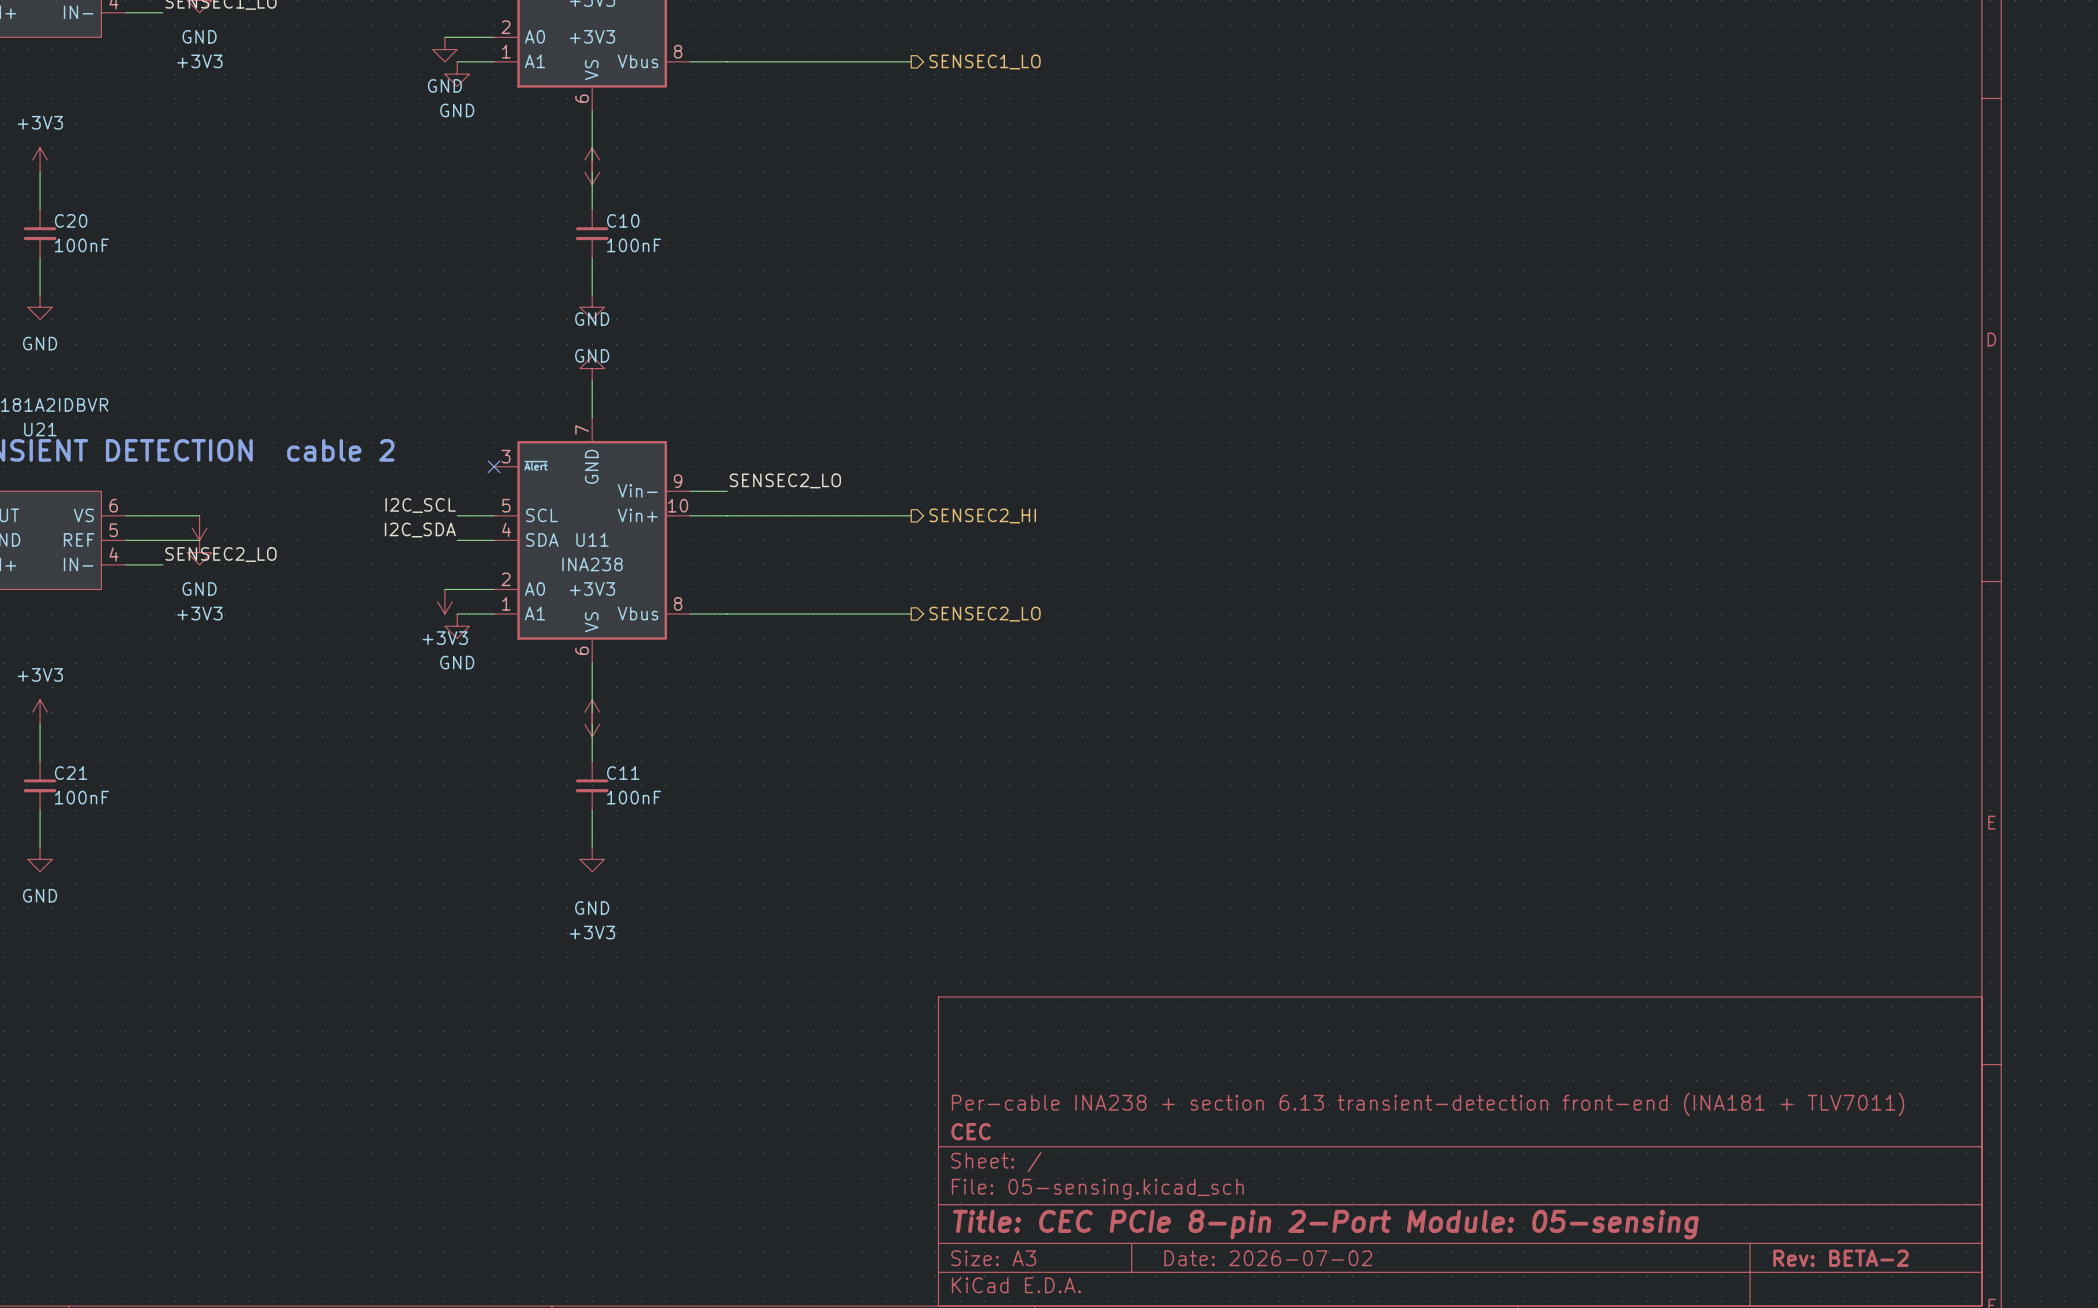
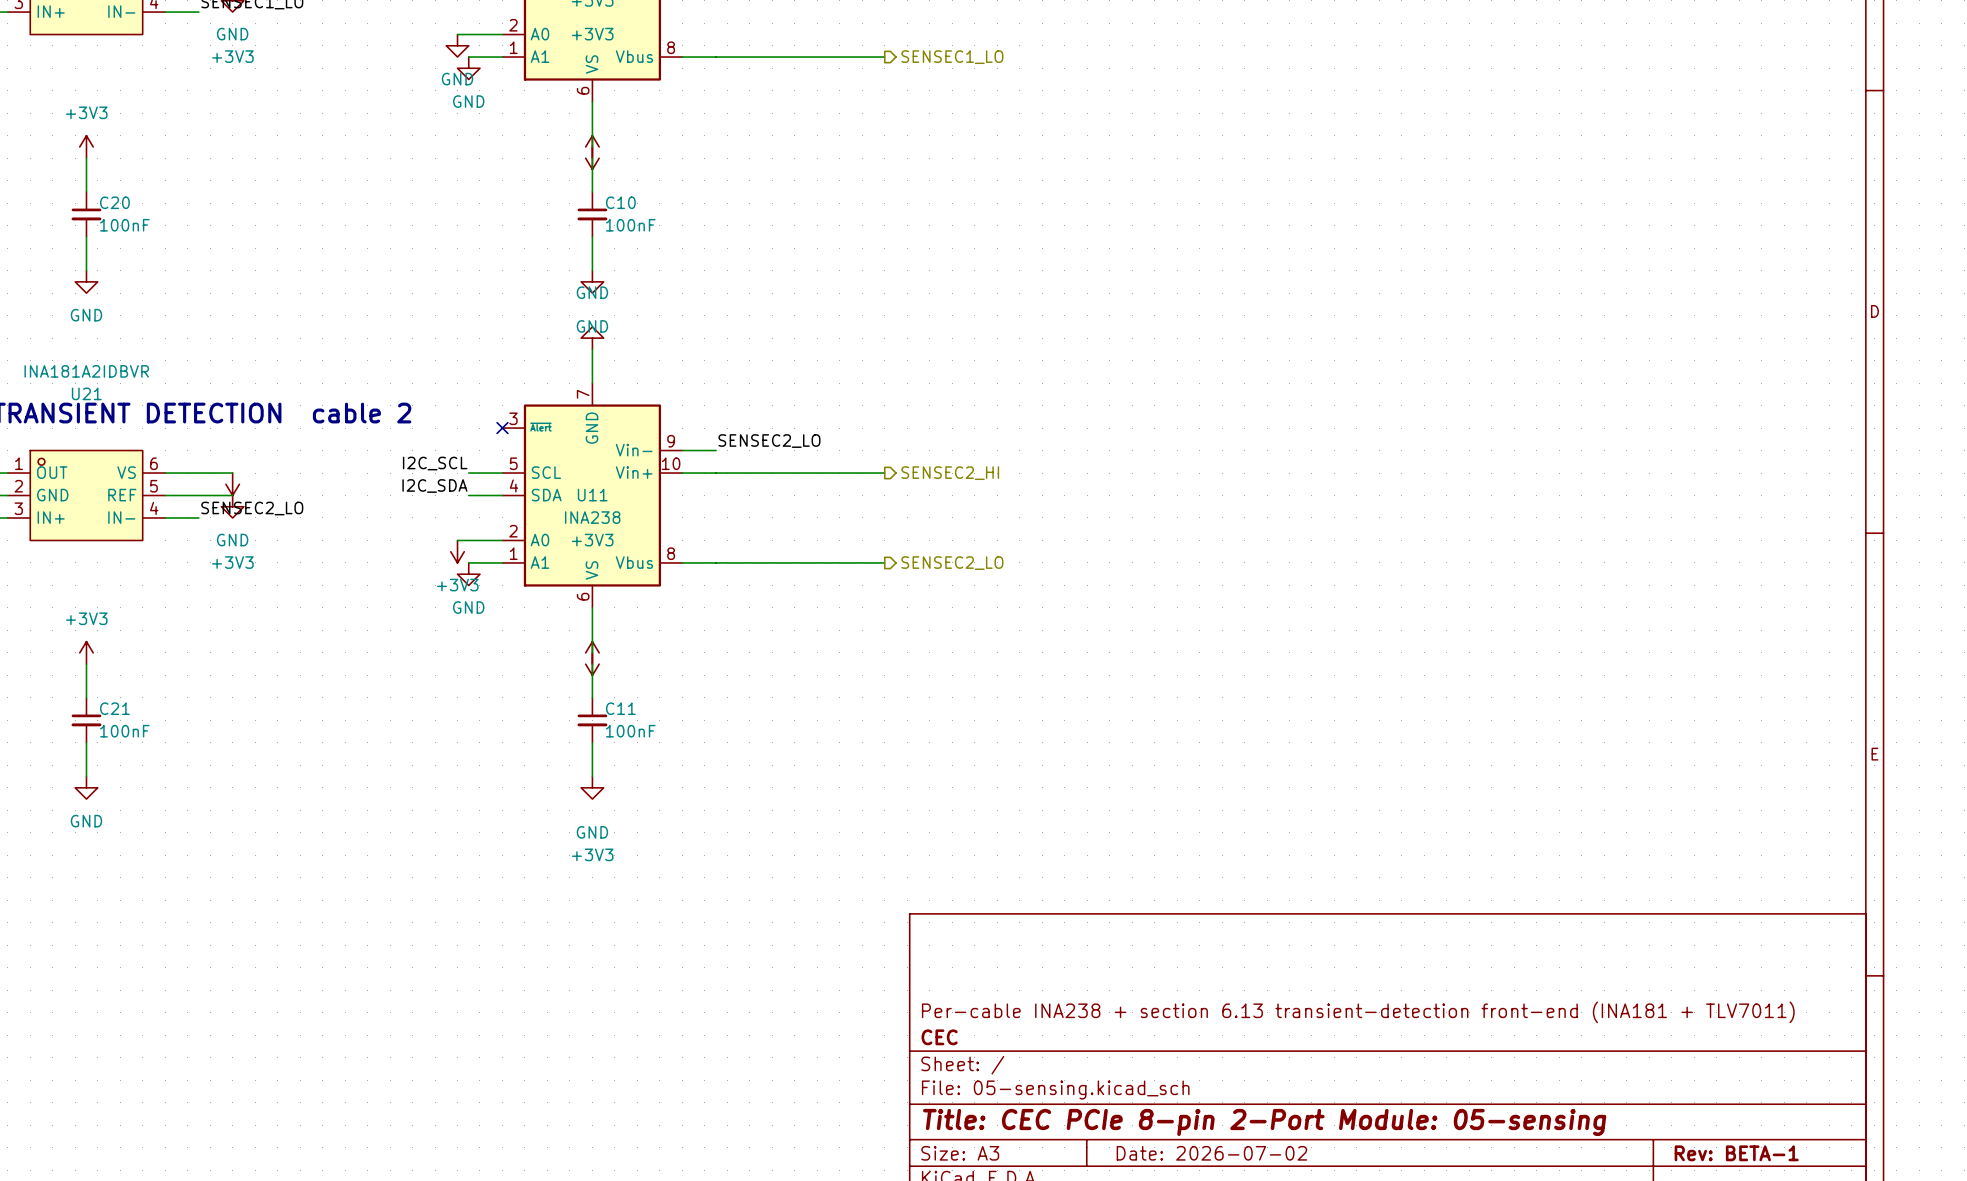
title block: Rev: BETA-2 (1840, 1258) -> Rev: BETA-1 (1736, 1153)

